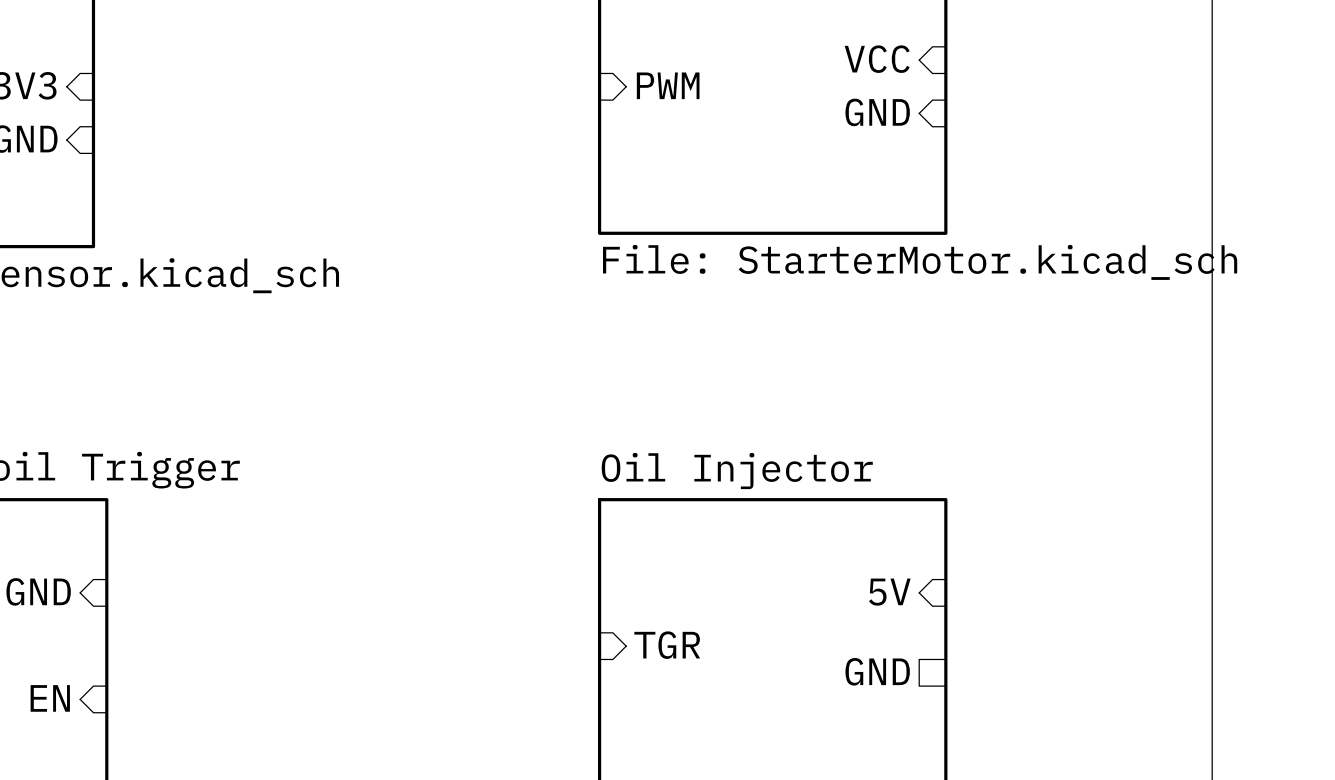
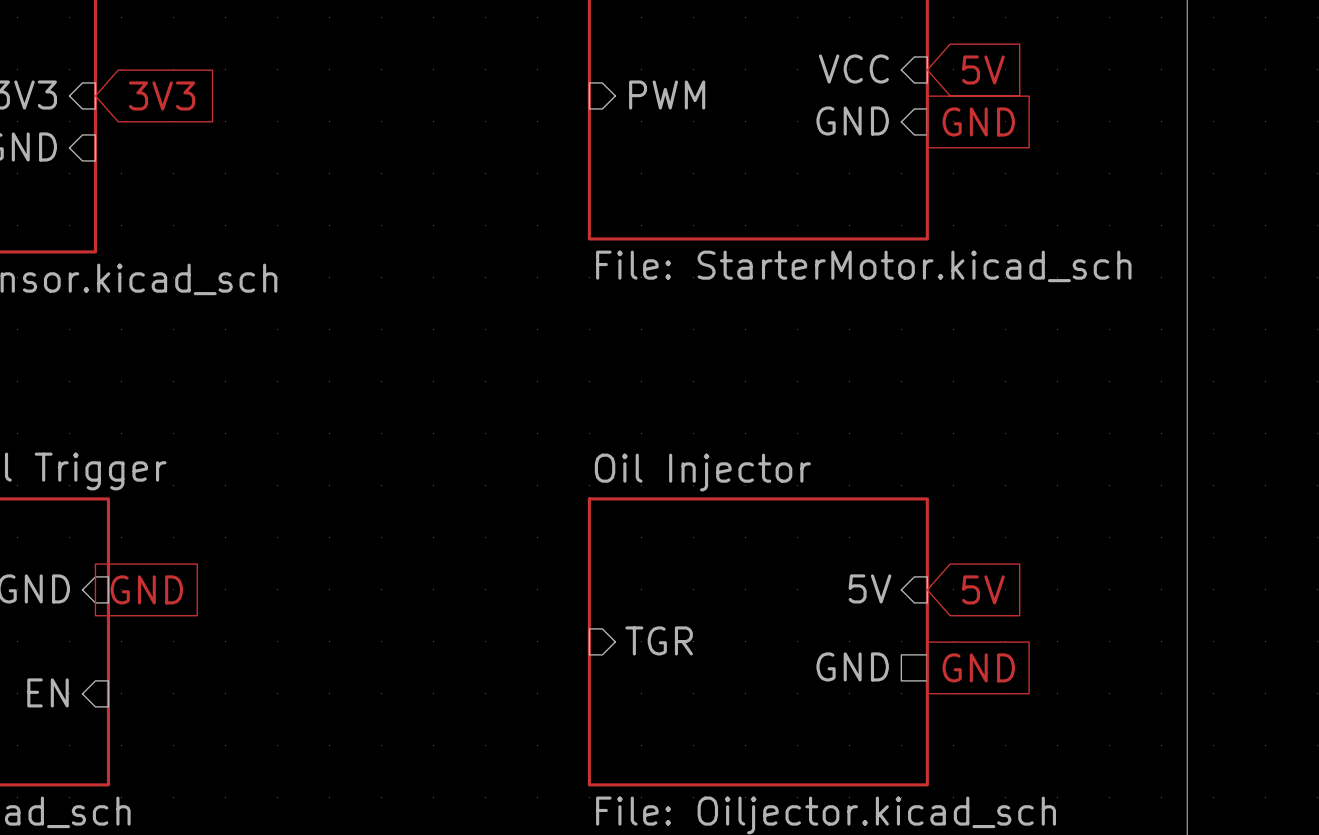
global label: none -> 5V (983, 69)
global label: none -> 3V3 (162, 95)
global label: none -> GND (978, 121)
global label: none -> GND (146, 589)
global label: none -> 5V (983, 589)
global label: none -> GND (978, 667)

